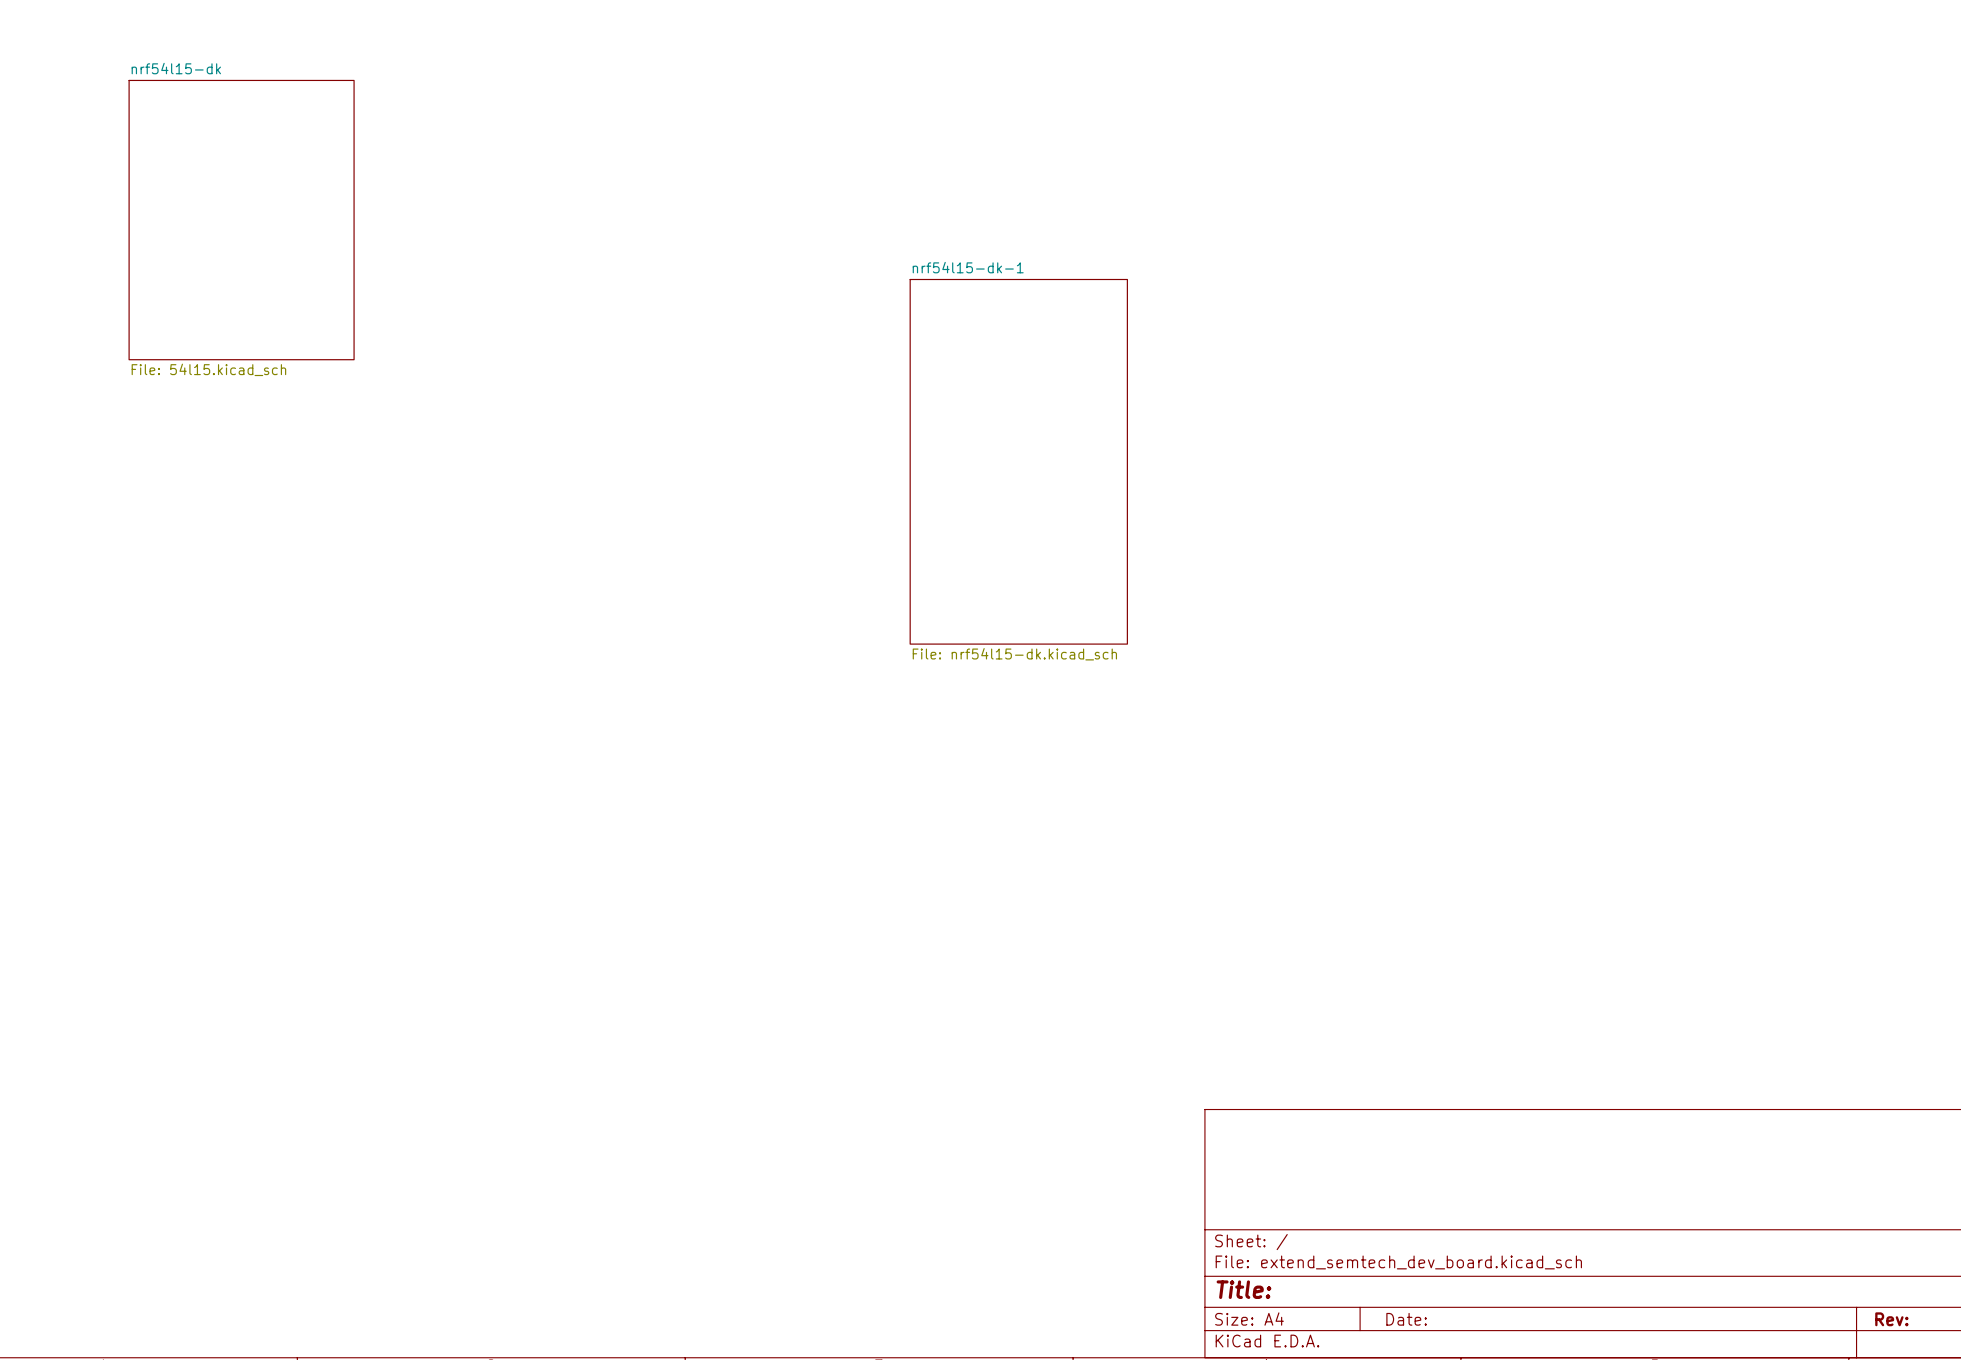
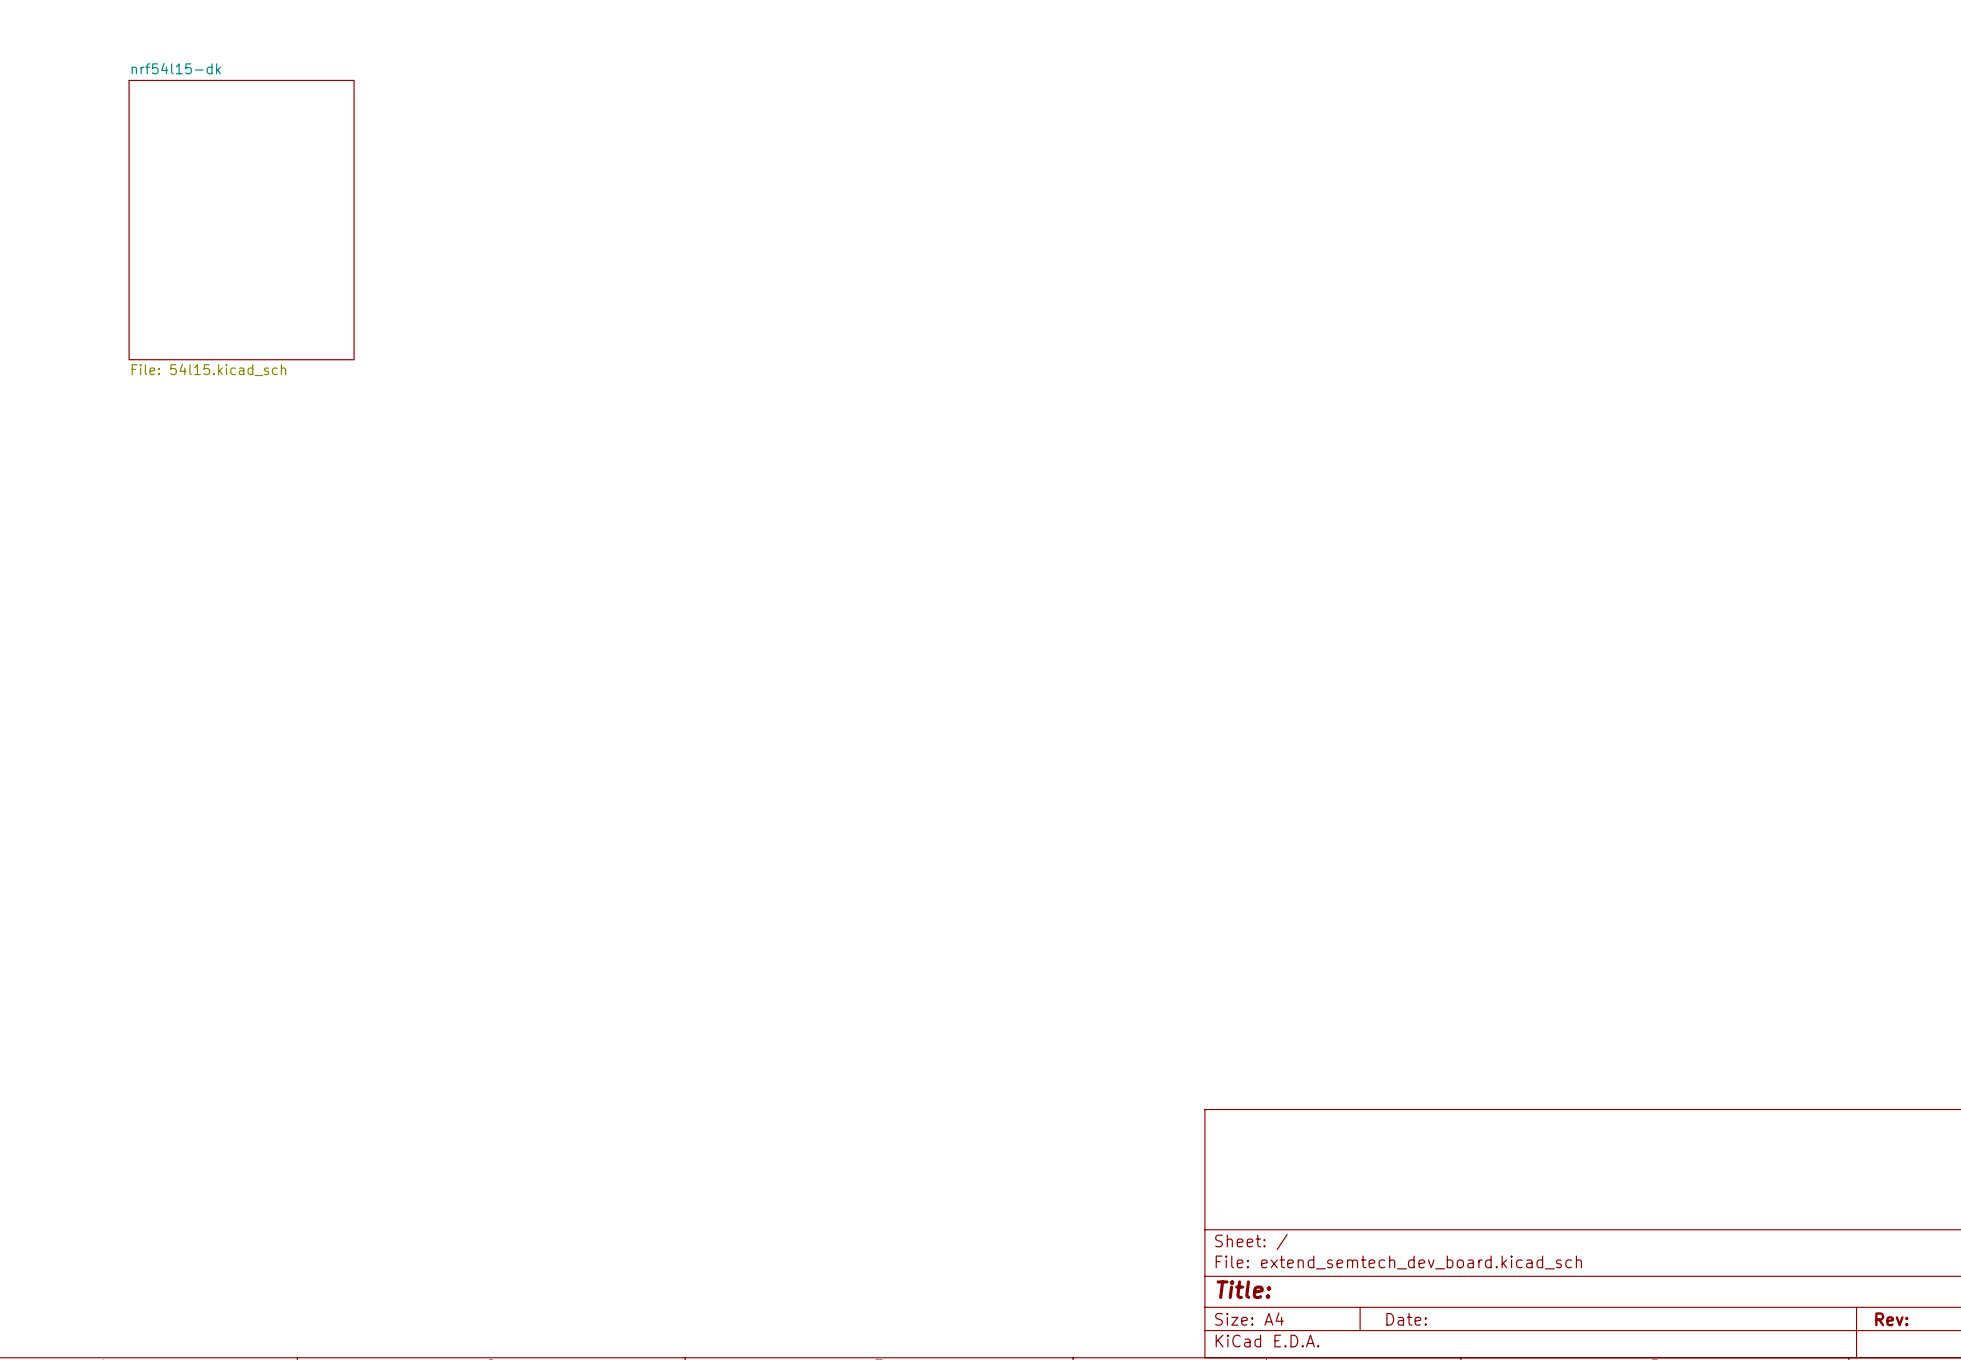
sheet nrf54l15-dk-1: File: nrf54l15-dk.kicad_sch (1018, 461) -> none

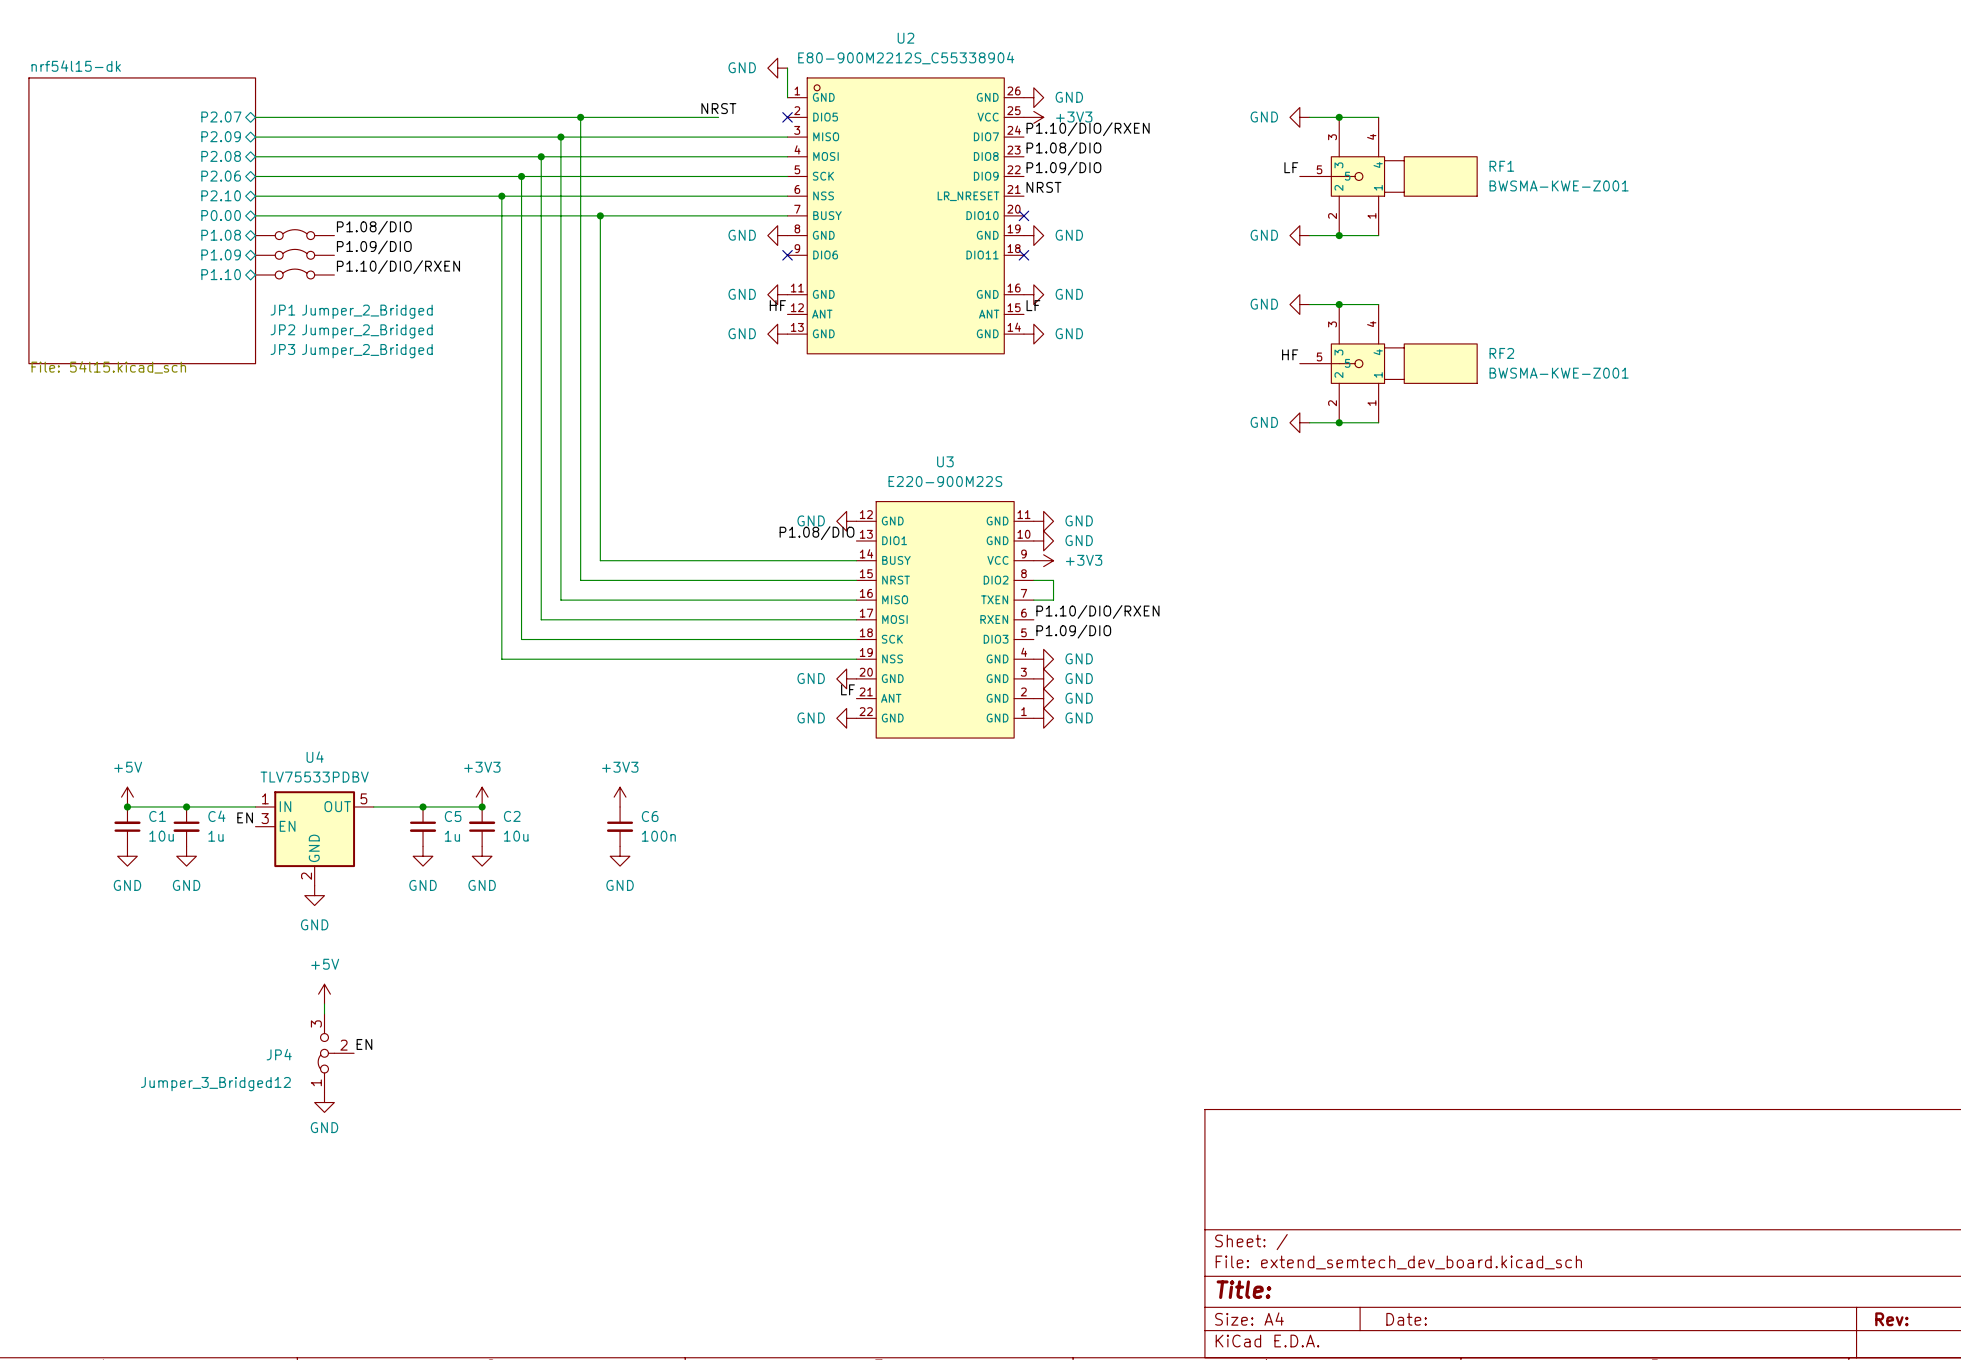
power symbol: none -> GND (777, 68)
wire: none -> (787, 68) (787, 97)
sheet nrf54l15-dk shape: [128, 79, 355, 361] -> [28, 77, 257, 365]
power symbol: none -> GND (1033, 97)
label: none -> NRST (718, 108)
sheet pin: none -> P2.07 (221, 117)
wire: none -> (255, 117) (718, 117)
wire: none -> (580, 117) (580, 580) (856, 580)
junction: none -> (580, 117)
no-connect mark: none -> (787, 117)
power symbol: none -> +3V3 (1033, 117)
power symbol: none -> GND (1299, 117)
wire: none -> (1309, 117) (1378, 117)
junction: none -> (1339, 117)
label: none -> P1.10/DIO/RXEN (1088, 129)
sheet pin: none -> P2.09 (221, 136)
wire: none -> (255, 137) (787, 137)
wire: none -> (560, 137) (560, 600) (856, 600)
junction: none -> (560, 137)
label: none -> P1.08/DIO (1063, 148)
sheet pin: none -> P2.08 (221, 156)
wire: none -> (255, 156) (787, 156)
wire: none -> (541, 156) (541, 619) (856, 619)
junction: none -> (541, 156)
label: none -> LF (1291, 167)
label: none -> P1.09/DIO (1063, 168)
sheet pin: none -> P2.06 (221, 176)
wire: none -> (255, 176) (787, 176)
wire: none -> (521, 176) (521, 639) (856, 639)
junction: none -> (521, 176)
RF1: none -> BWSMA-KWE-Z001 (1388, 176)
label: none -> NRST (1043, 187)
sheet pin: none -> P2.10 (221, 195)
wire: none -> (255, 196) (787, 196)
wire: none -> (501, 196) (501, 659) (856, 659)
junction: none -> (501, 196)
sheet pin: none -> P0.00 (221, 215)
wire: none -> (255, 215) (787, 215)
wire: none -> (600, 215) (600, 560) (856, 560)
junction: none -> (600, 215)
U2: none -> E80-900M2212S_C55338904 (905, 215)
no-connect mark: none -> (1023, 215)
label: none -> P1.08/DIO (374, 227)
JP1: none -> Jumper_2_Bridged (294, 234)
sheet pin: none -> P1.08 (221, 235)
power symbol: none -> GND (777, 235)
power symbol: none -> GND (1033, 235)
power symbol: none -> GND (1299, 235)
wire: none -> (1309, 235) (1378, 235)
junction: none -> (1339, 235)
label: none -> P1.09/DIO (374, 247)
sheet pin: none -> P1.09 (221, 254)
JP2: none -> Jumper_2_Bridged (294, 254)
no-connect mark: none -> (787, 255)
no-connect mark: none -> (1023, 255)
label: none -> P1.10/DIO/RXEN (398, 267)
sheet pin: none -> P1.10 (221, 274)
JP3: none -> Jumper_2_Bridged (294, 274)
power symbol: none -> GND (777, 294)
power symbol: none -> GND (1033, 294)
power symbol: none -> GND (1299, 304)
wire: none -> (1309, 304) (1378, 304)
junction: none -> (1339, 304)
label: none -> HF (777, 305)
label: none -> LF (1033, 305)
power symbol: none -> GND (777, 334)
power symbol: none -> GND (1033, 334)
label: none -> HF (1290, 354)
RF2: none -> BWSMA-KWE-Z001 (1388, 363)
power symbol: none -> GND (1299, 422)
wire: none -> (1309, 422) (1378, 422)
junction: none -> (1339, 422)
power symbol: none -> GND (846, 521)
power symbol: none -> GND (1043, 521)
label: none -> P1.08/DIO (817, 533)
power symbol: none -> GND (1043, 540)
power symbol: none -> +3V3 (1043, 560)
wire: none -> (1033, 580) (1053, 580) (1053, 600) (1033, 600)
label: none -> P1.10/DIO/RXEN (1097, 611)
U3: none -> E220-900M22S (945, 619)
label: none -> P1.09/DIO (1073, 631)
power symbol: none -> GND (1043, 659)
power symbol: none -> GND (846, 678)
power symbol: none -> GND (1043, 678)
label: none -> LF (847, 689)
power symbol: none -> GND (1043, 698)
power symbol: none -> GND (846, 718)
power symbol: none -> GND (1043, 718)
power symbol: none -> +5V (127, 797)
power symbol: none -> +3V3 (482, 797)
power symbol: none -> +3V3 (620, 797)
wire: none -> (127, 806) (255, 806)
junction: none -> (127, 806)
junction: none -> (186, 806)
wire: none -> (373, 806) (482, 806)
junction: none -> (423, 806)
junction: none -> (482, 806)
label: none -> EN (245, 817)
C1: none -> 10u (127, 826)
C4: none -> 1u (186, 826)
C5: none -> 1u (423, 826)
C2: none -> 10u (482, 826)
C6: none -> 100n (620, 826)
U4: none -> TLV75533PDBV (314, 838)
power symbol: none -> GND (127, 856)
power symbol: none -> GND (186, 856)
power symbol: none -> GND (423, 856)
power symbol: none -> GND (482, 856)
power symbol: none -> GND (620, 856)
power symbol: none -> GND (314, 895)
power symbol: none -> +5V (324, 994)
wire: none -> (324, 1004) (324, 1013)
label: none -> EN (364, 1044)
JP4: none -> Jumper_3_Bridged12 (336, 1053)
power symbol: none -> GND (324, 1102)

